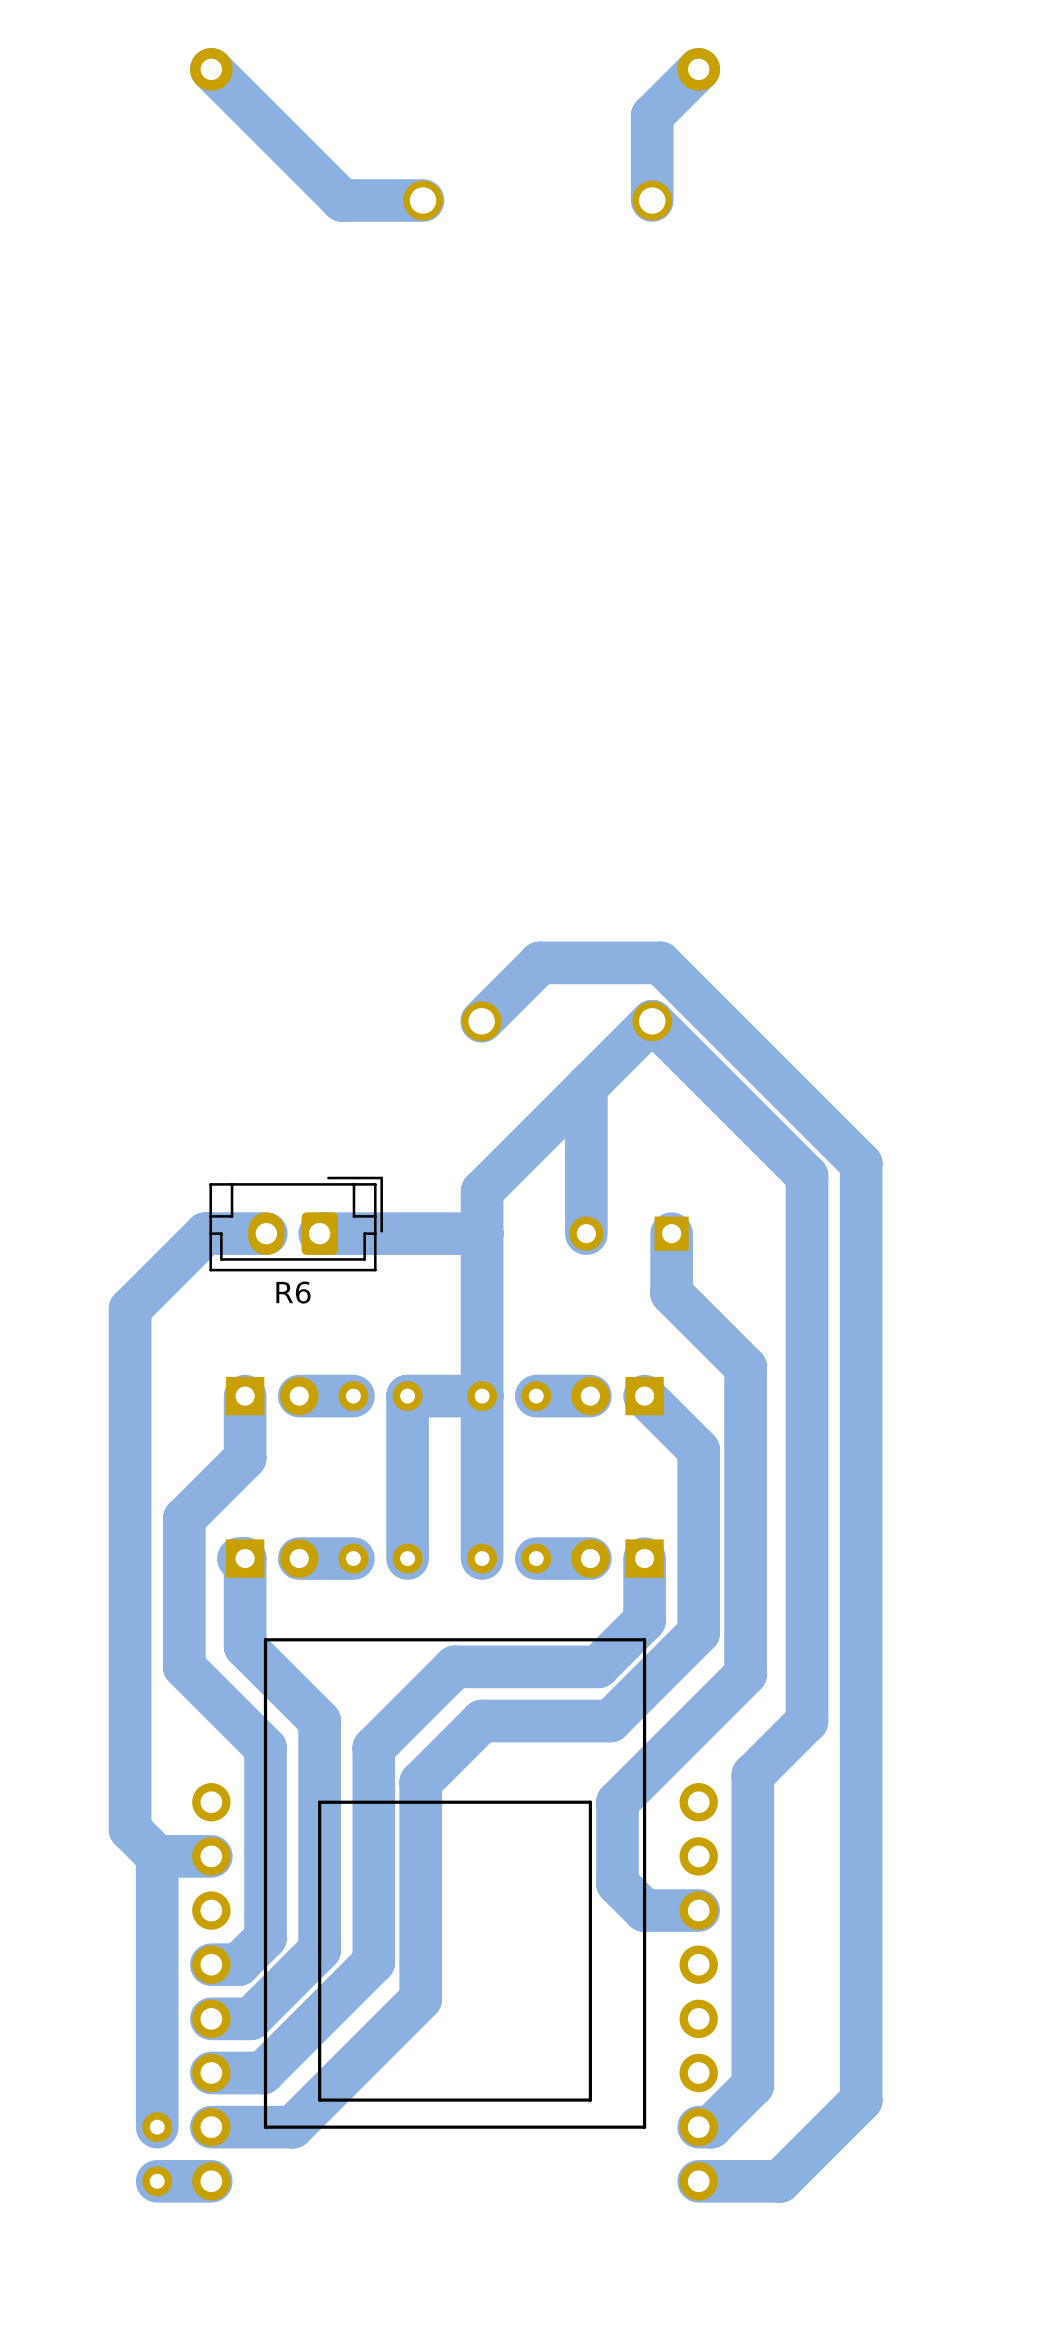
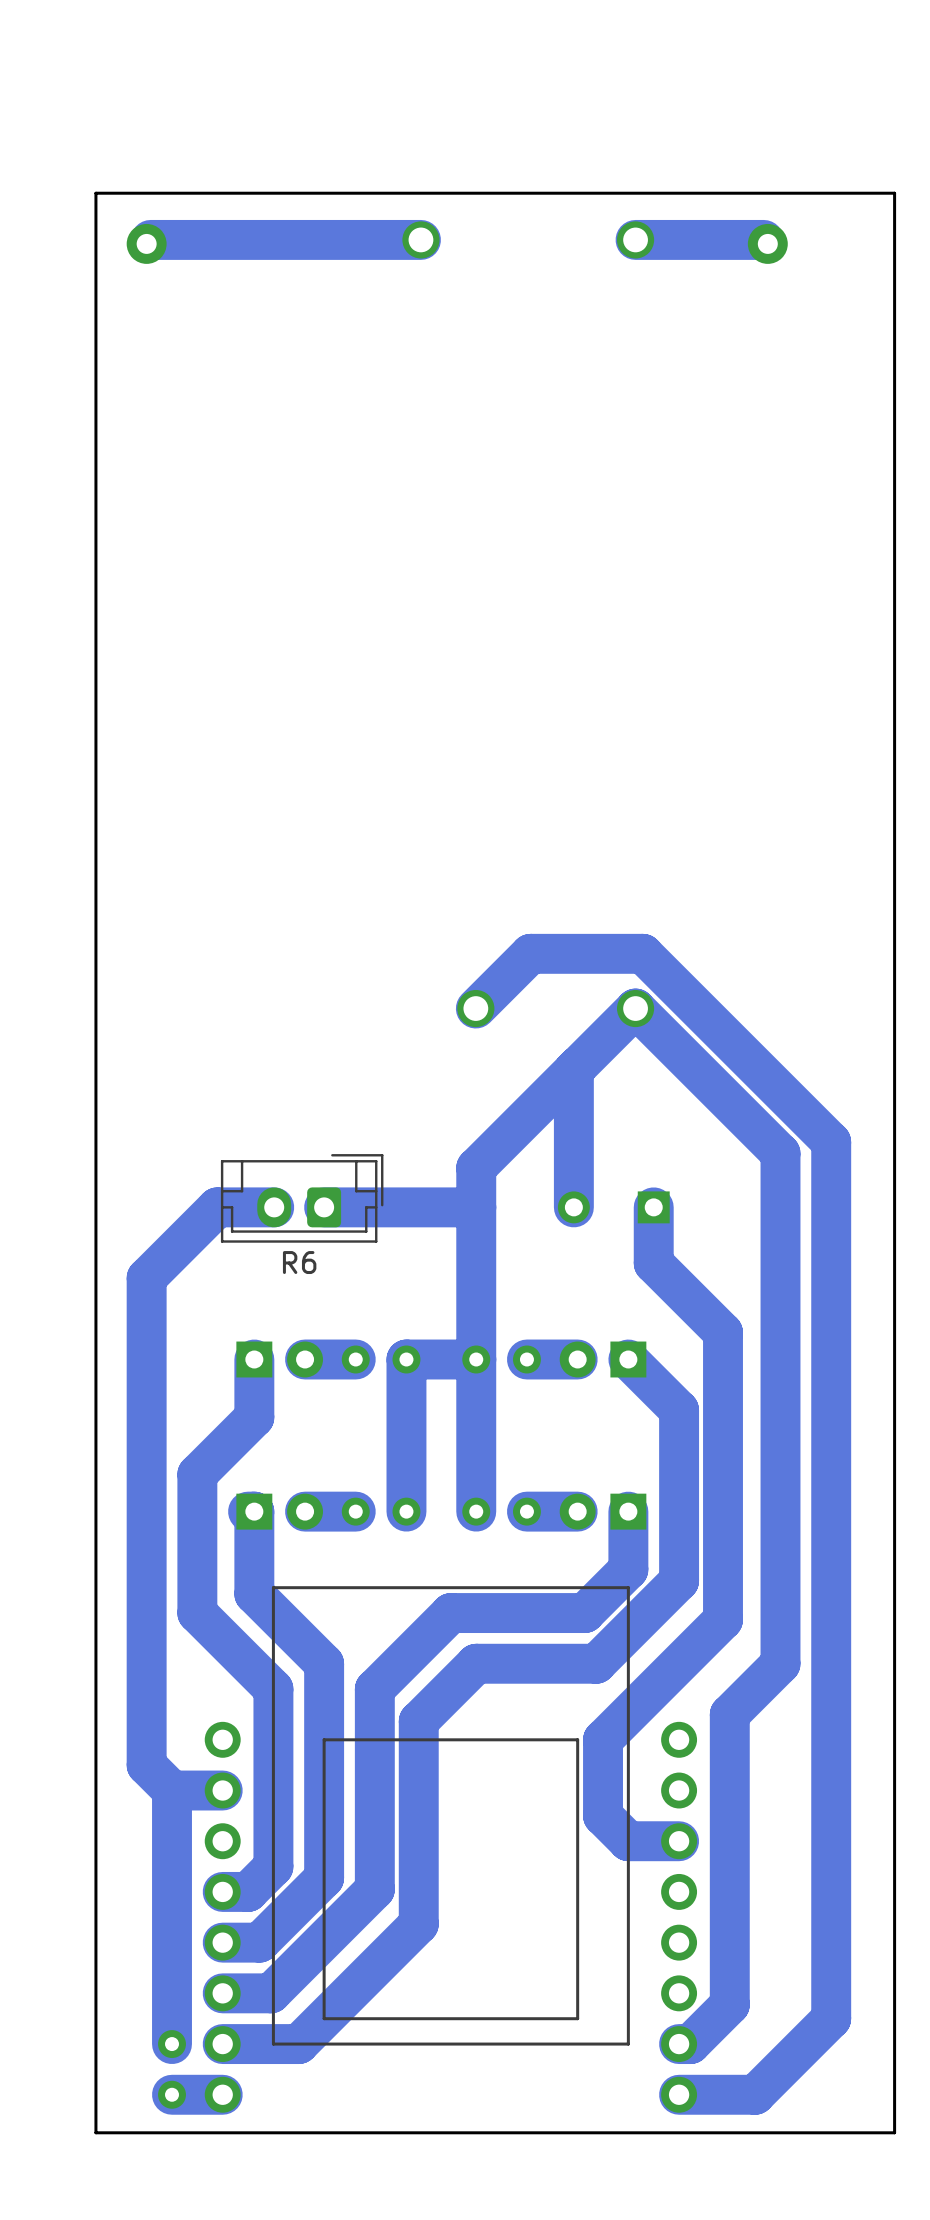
track: (211, 69) (342, 200) -> (150, 239) (345, 239)
part position: (211, 69) -> (146, 243)
track: (698, 69) (652, 115) (652, 200) -> (763, 239) (635, 239)
part position: (698, 69) -> (767, 243)
board edge: none -> (894, 193) (95, 193) (95, 2132) (894, 2132) (894, 193)

